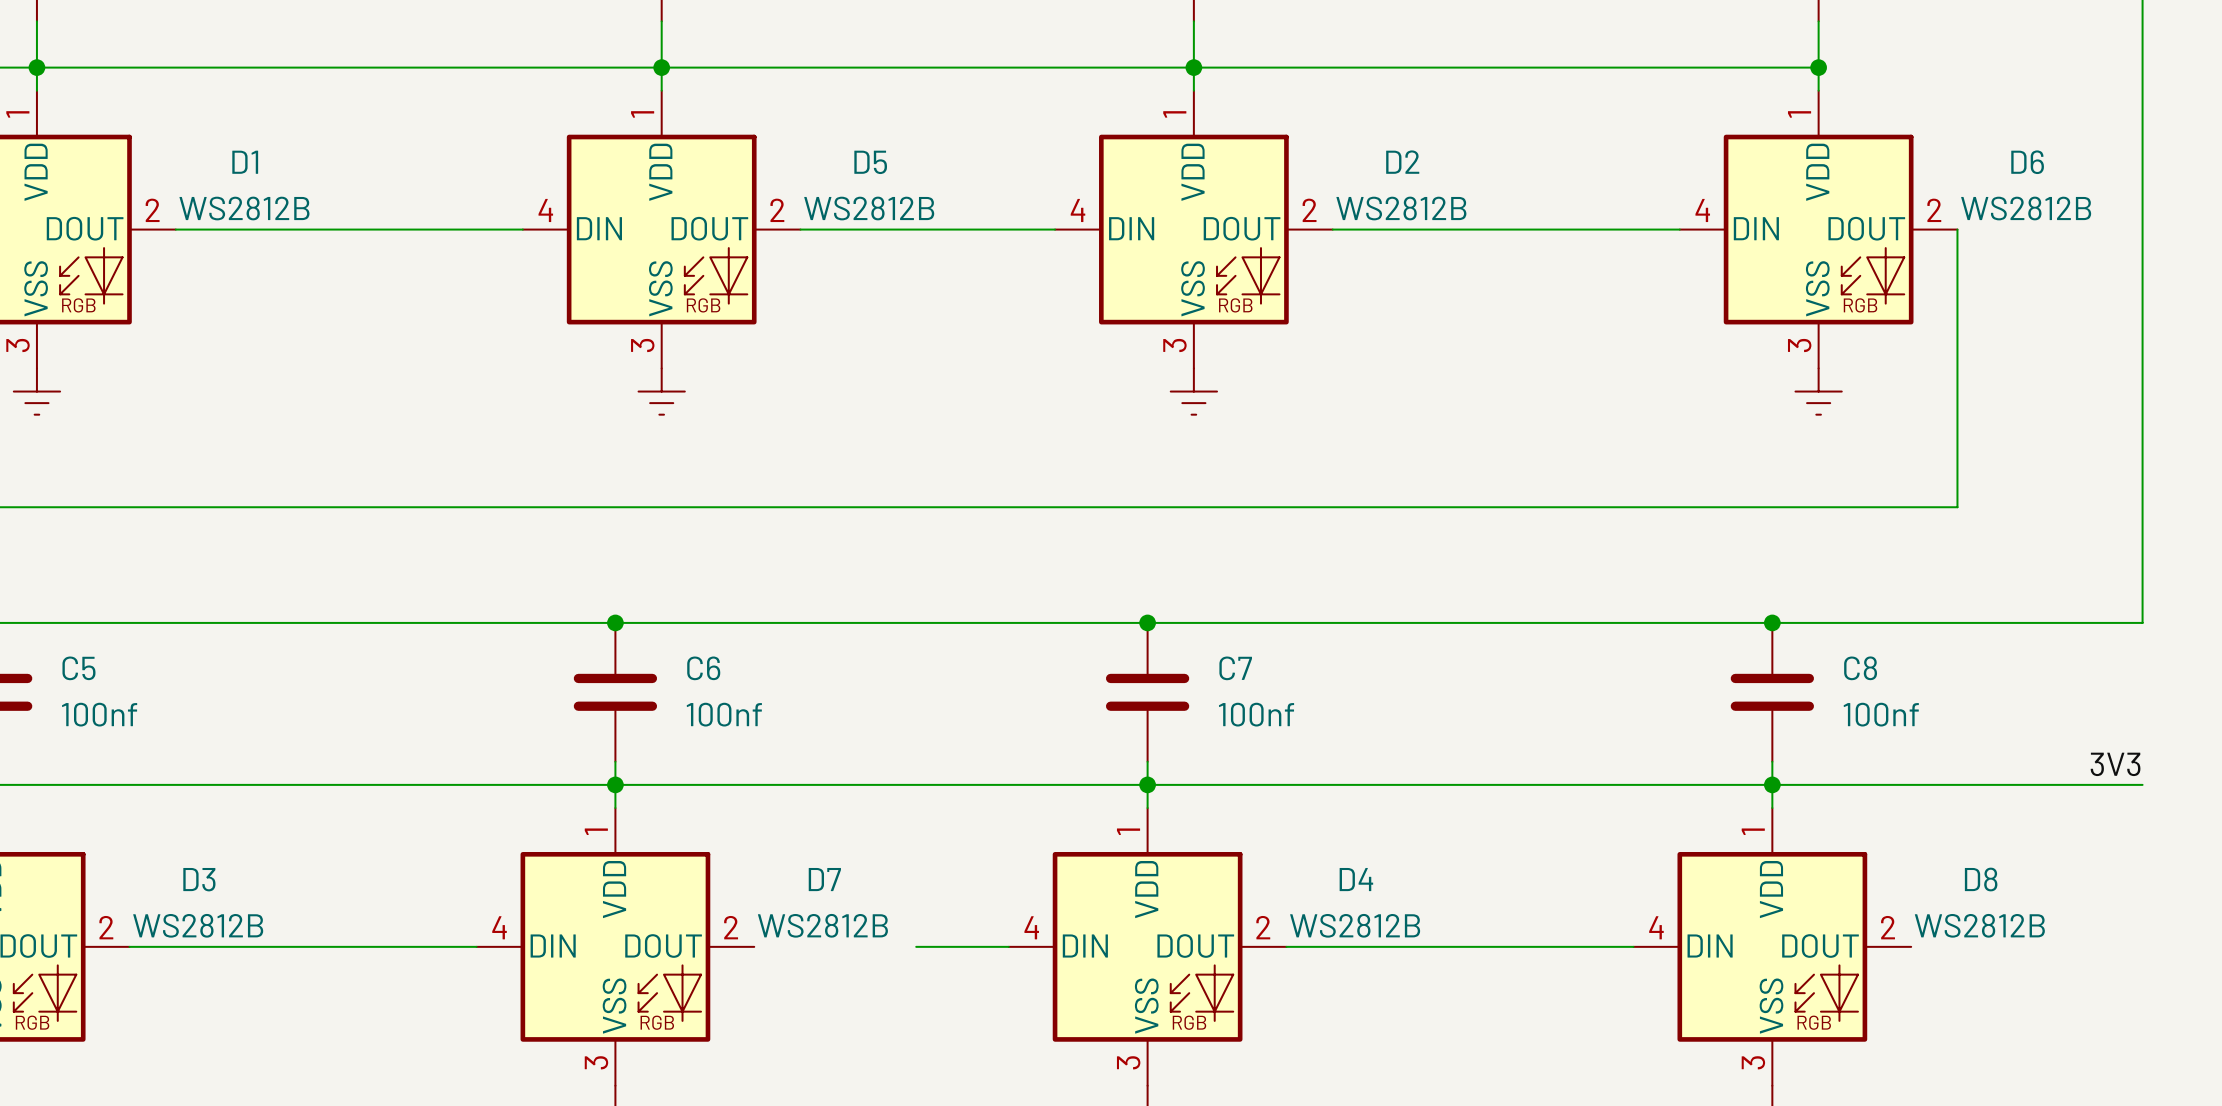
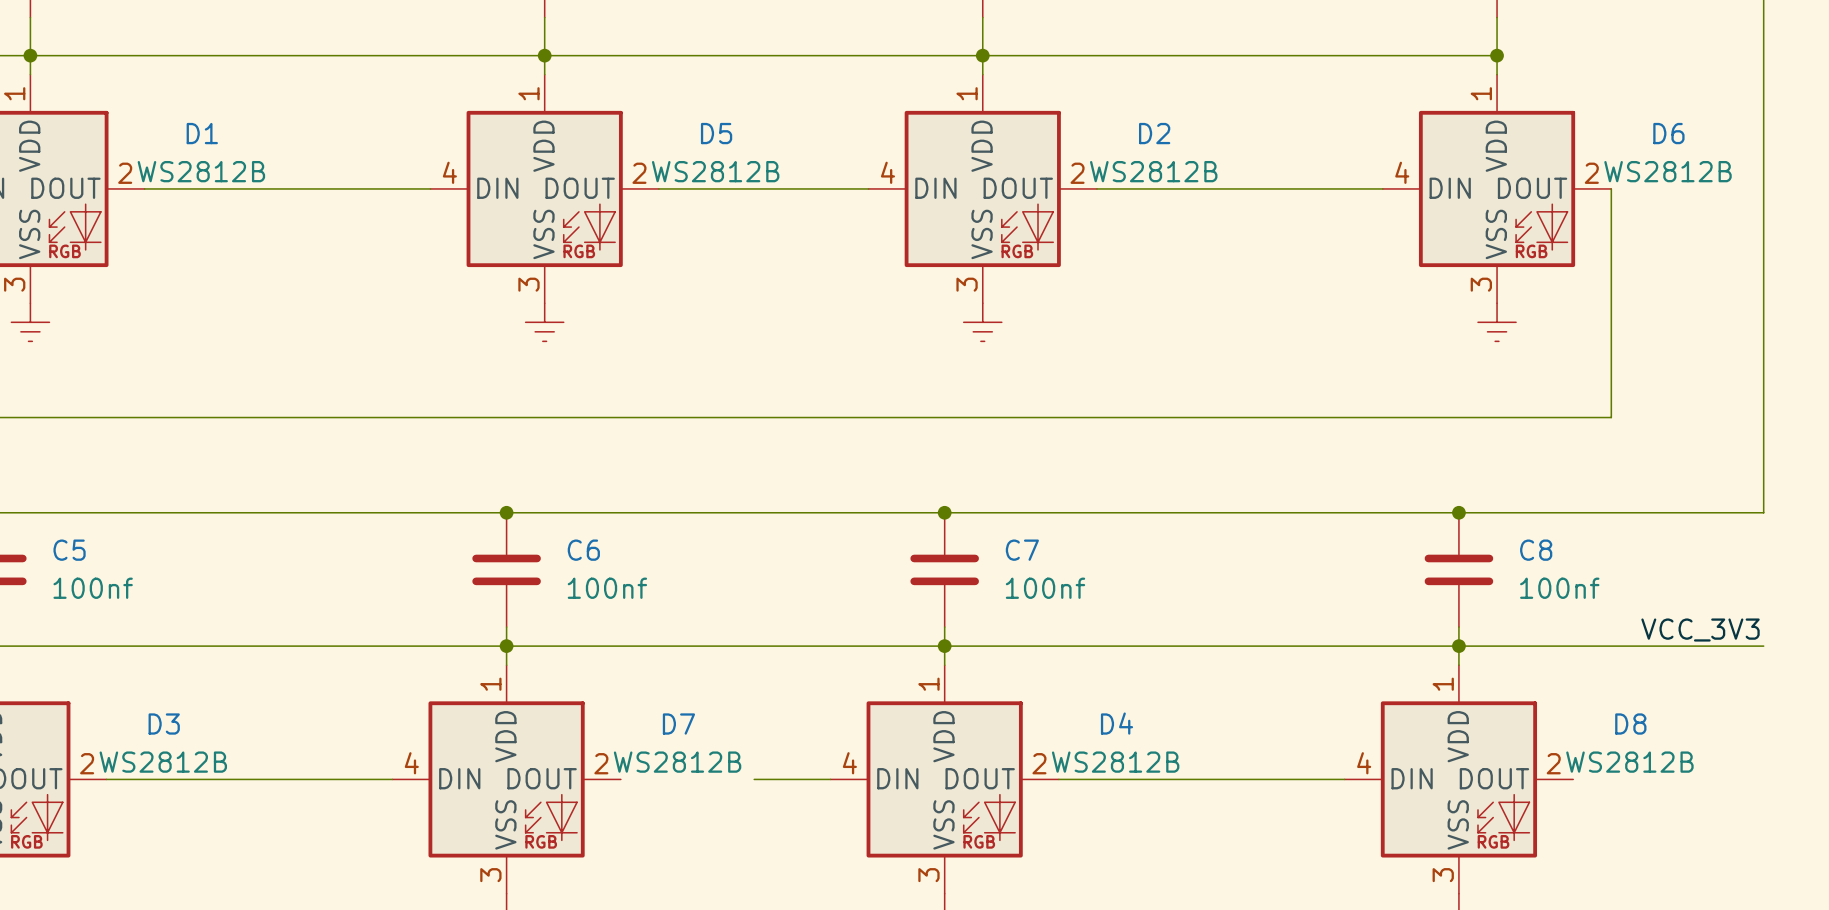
label: 3V3 (2115, 764) -> VCC_3V3 (1700, 630)

